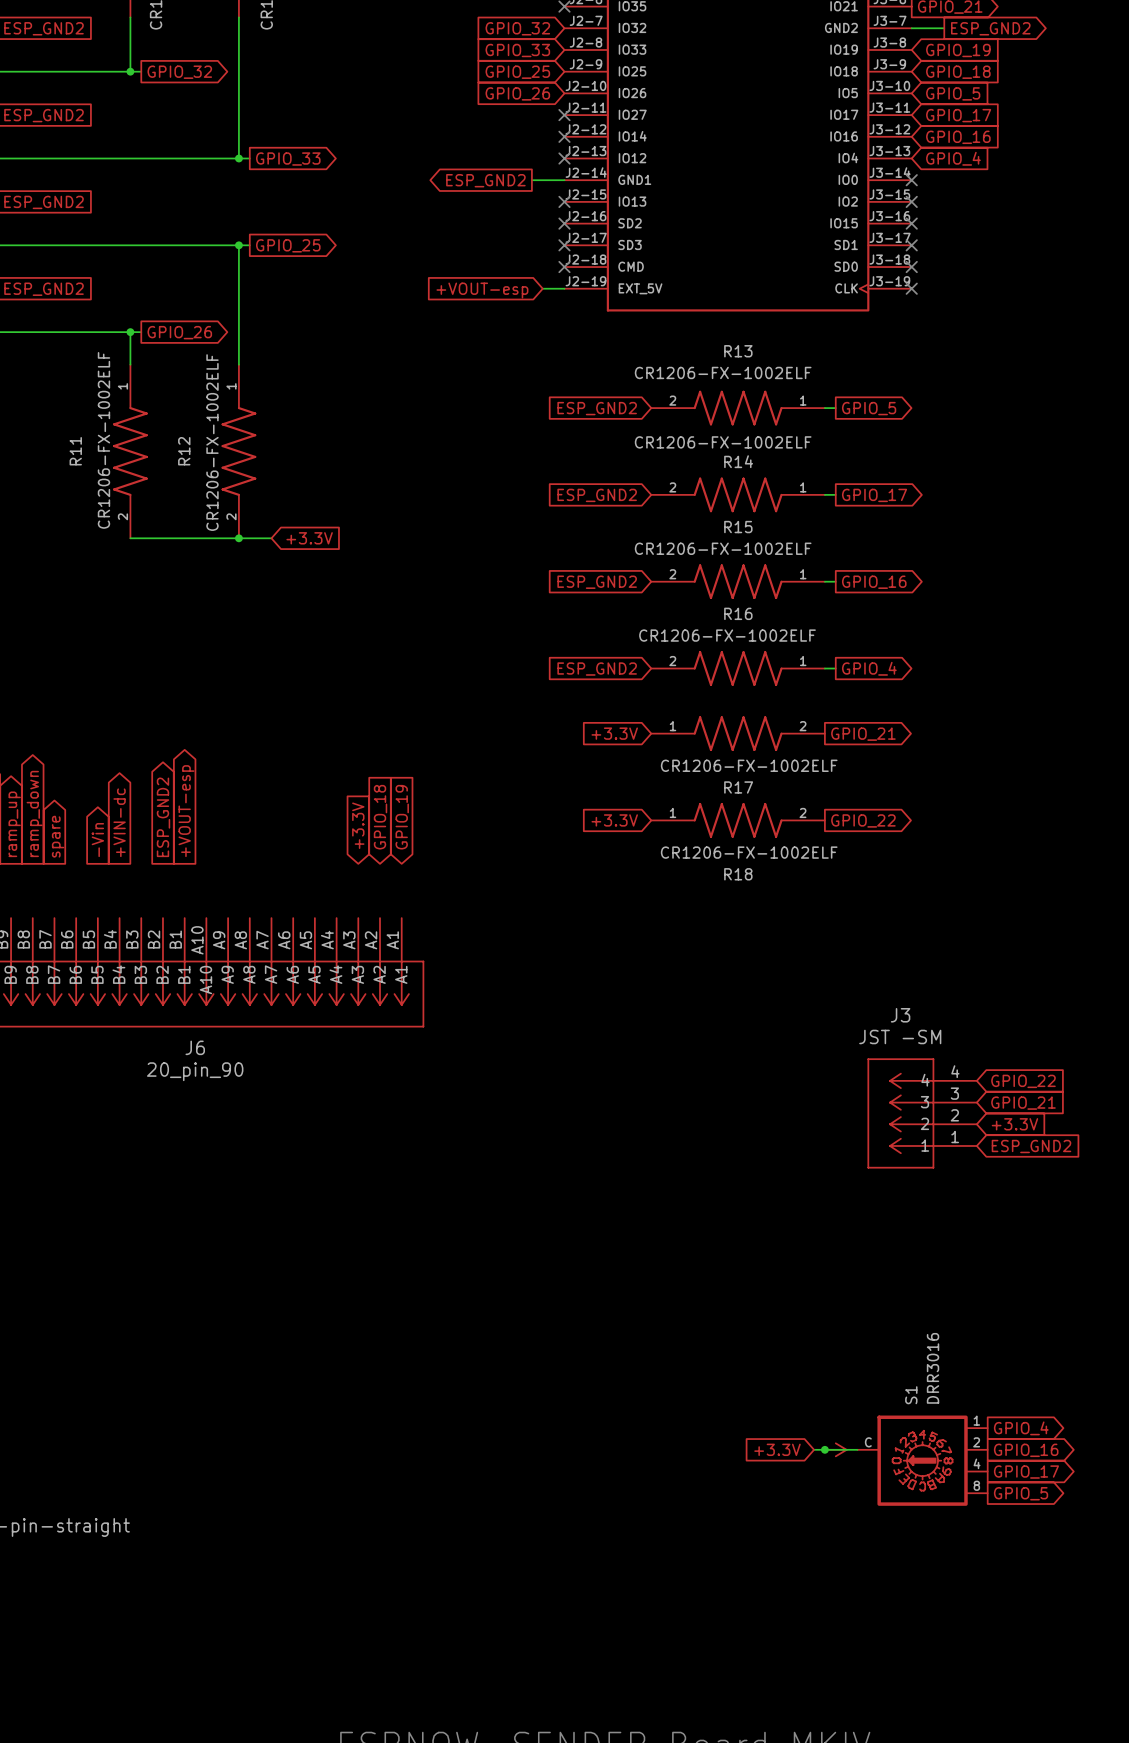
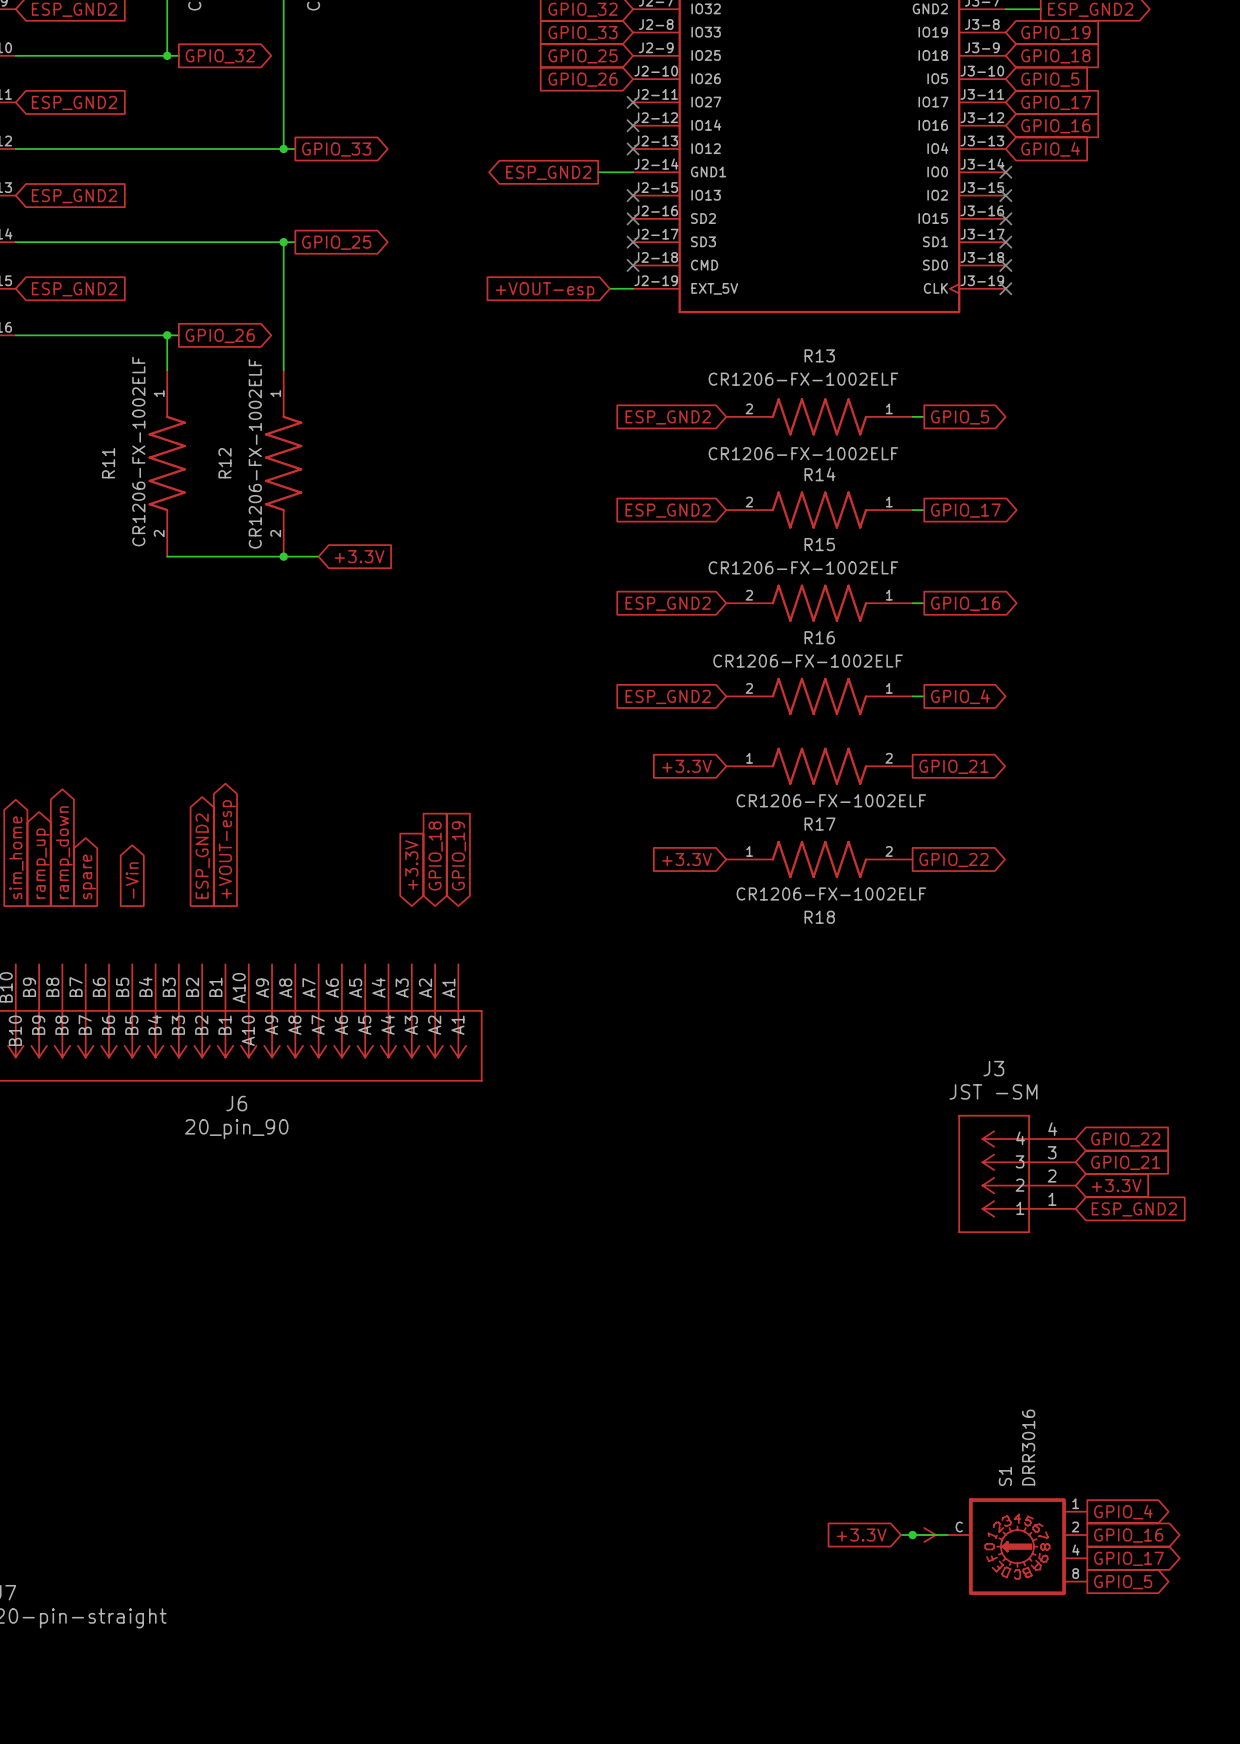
global label: +VIN-dc (119, 822) -> none

